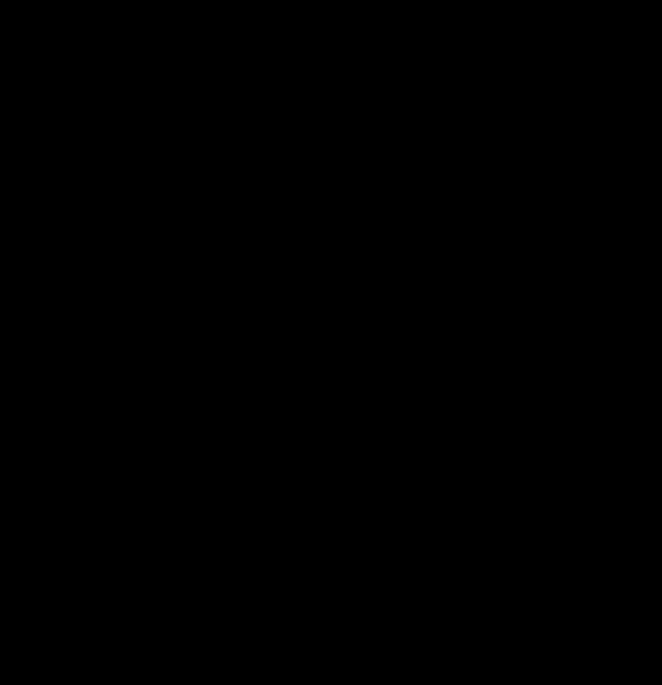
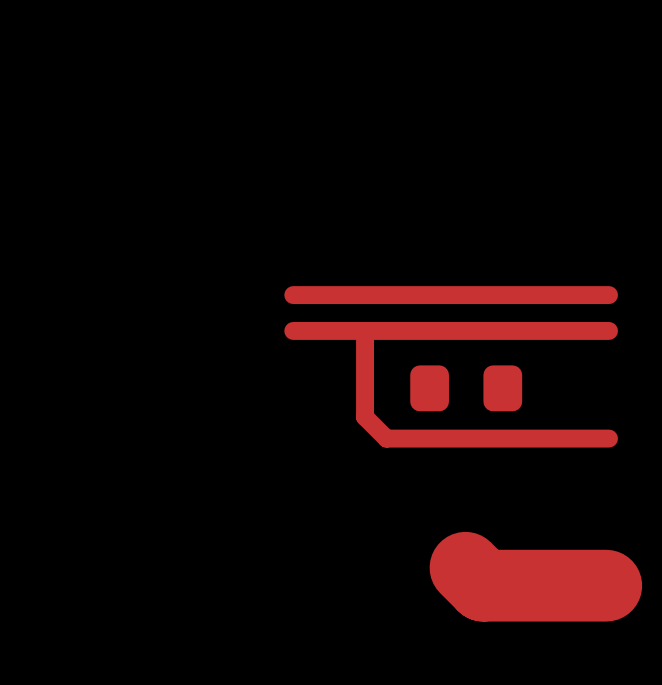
top track: none -> (608, 295) (293, 295)
top track: none -> (365, 330) (365, 417) (386, 438) (608, 438)
top track: none -> (608, 330) (293, 330)
part: none -> (466, 388)
top track: none -> (465, 567) (483, 585) (606, 585)

